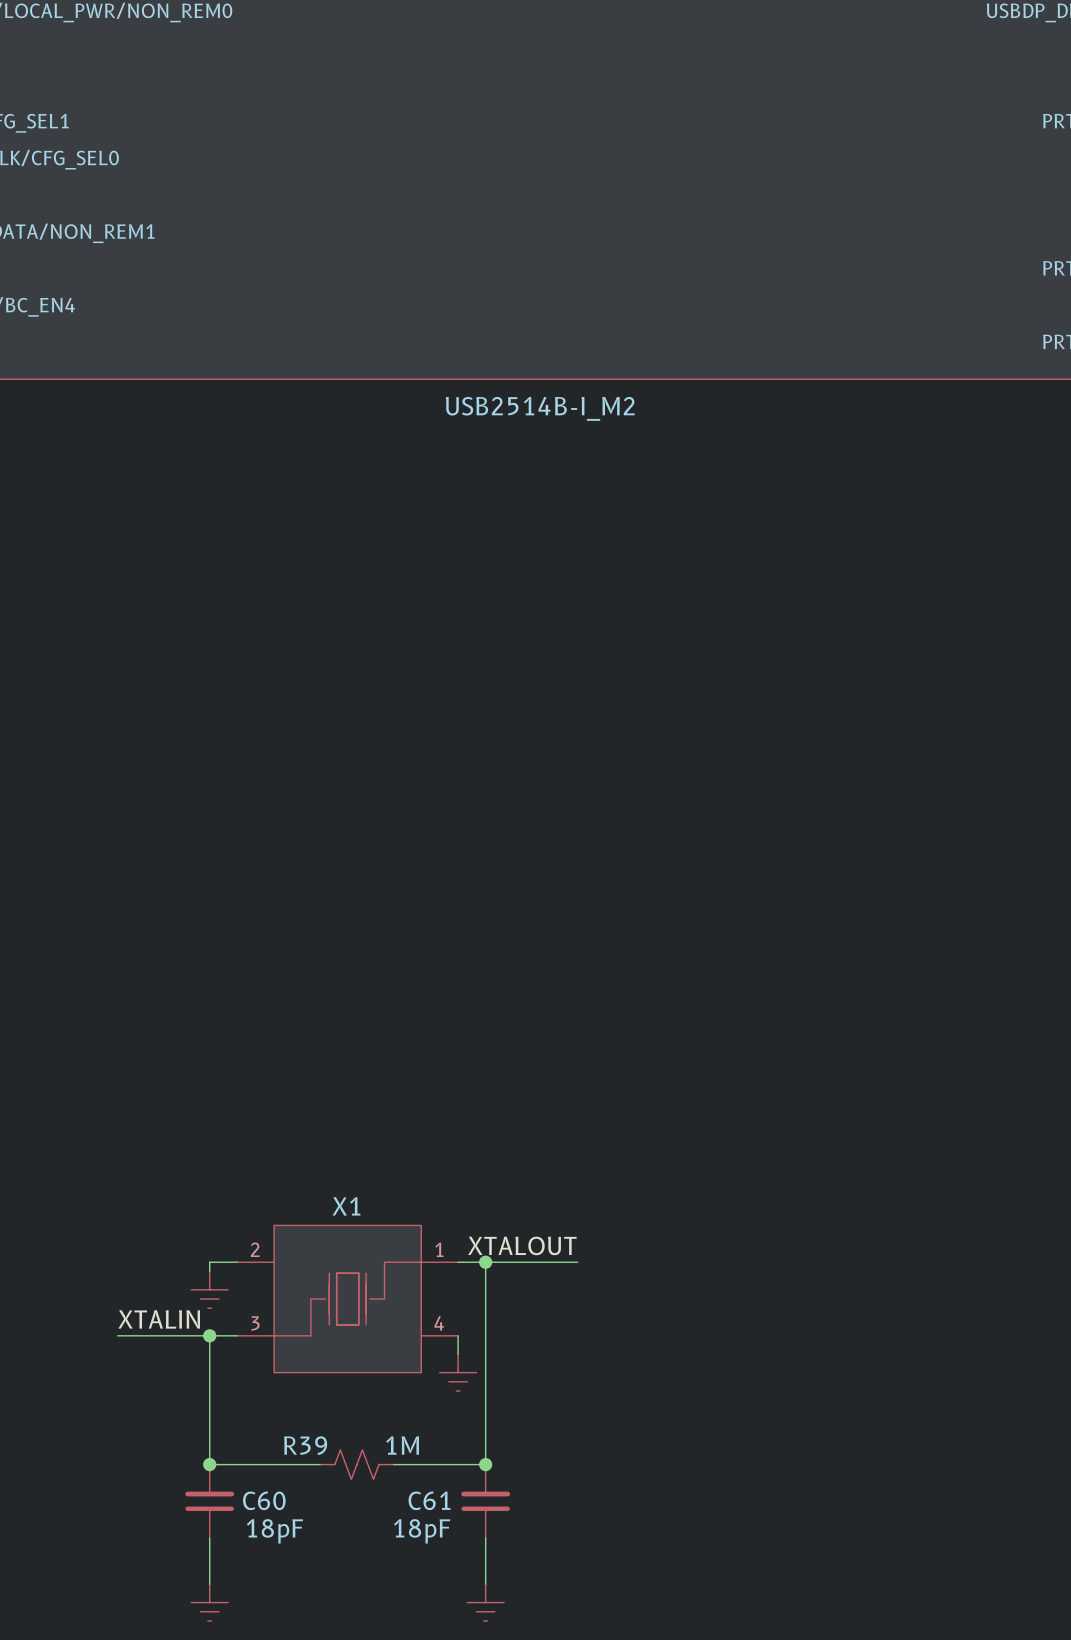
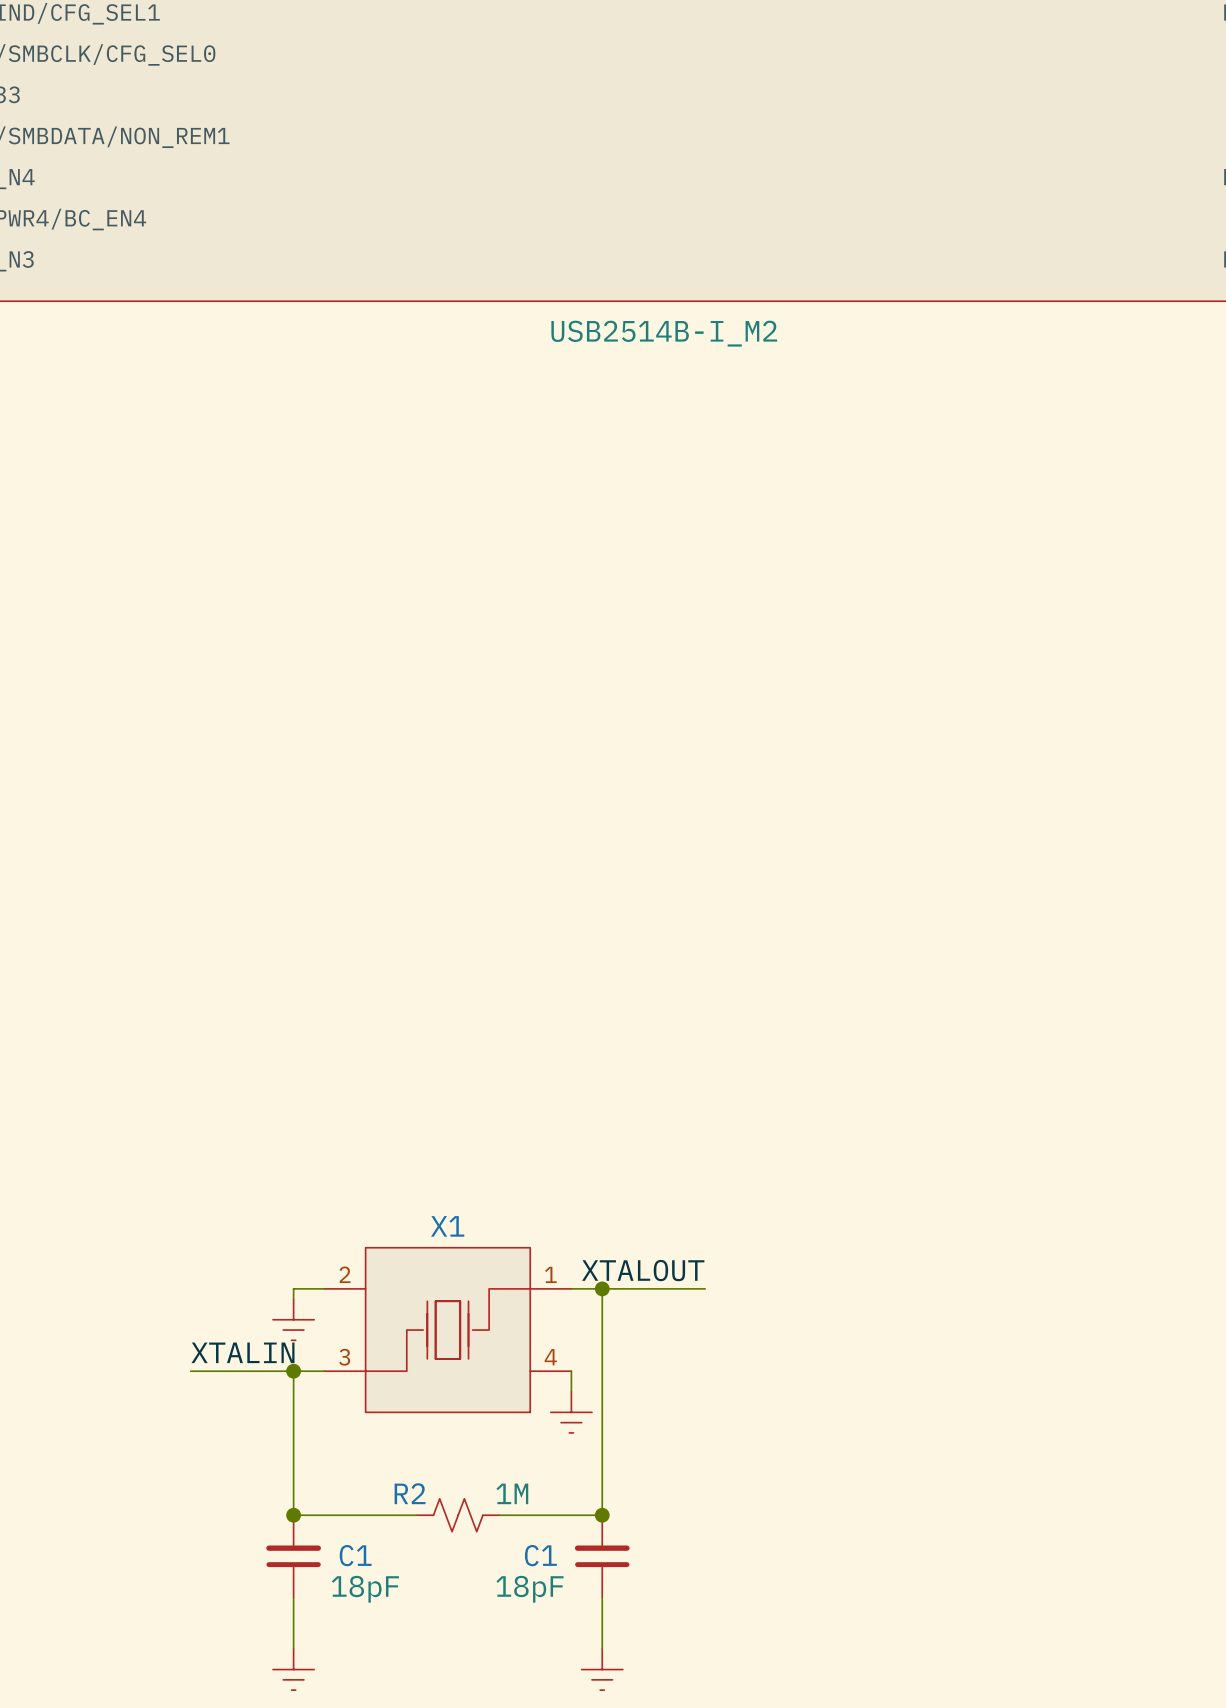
R39 name: R39 (305, 1445) -> R2 (410, 1493)
C60 name: C60 (264, 1500) -> C1 (355, 1555)
C61 name: C61 (429, 1500) -> C1 (540, 1555)

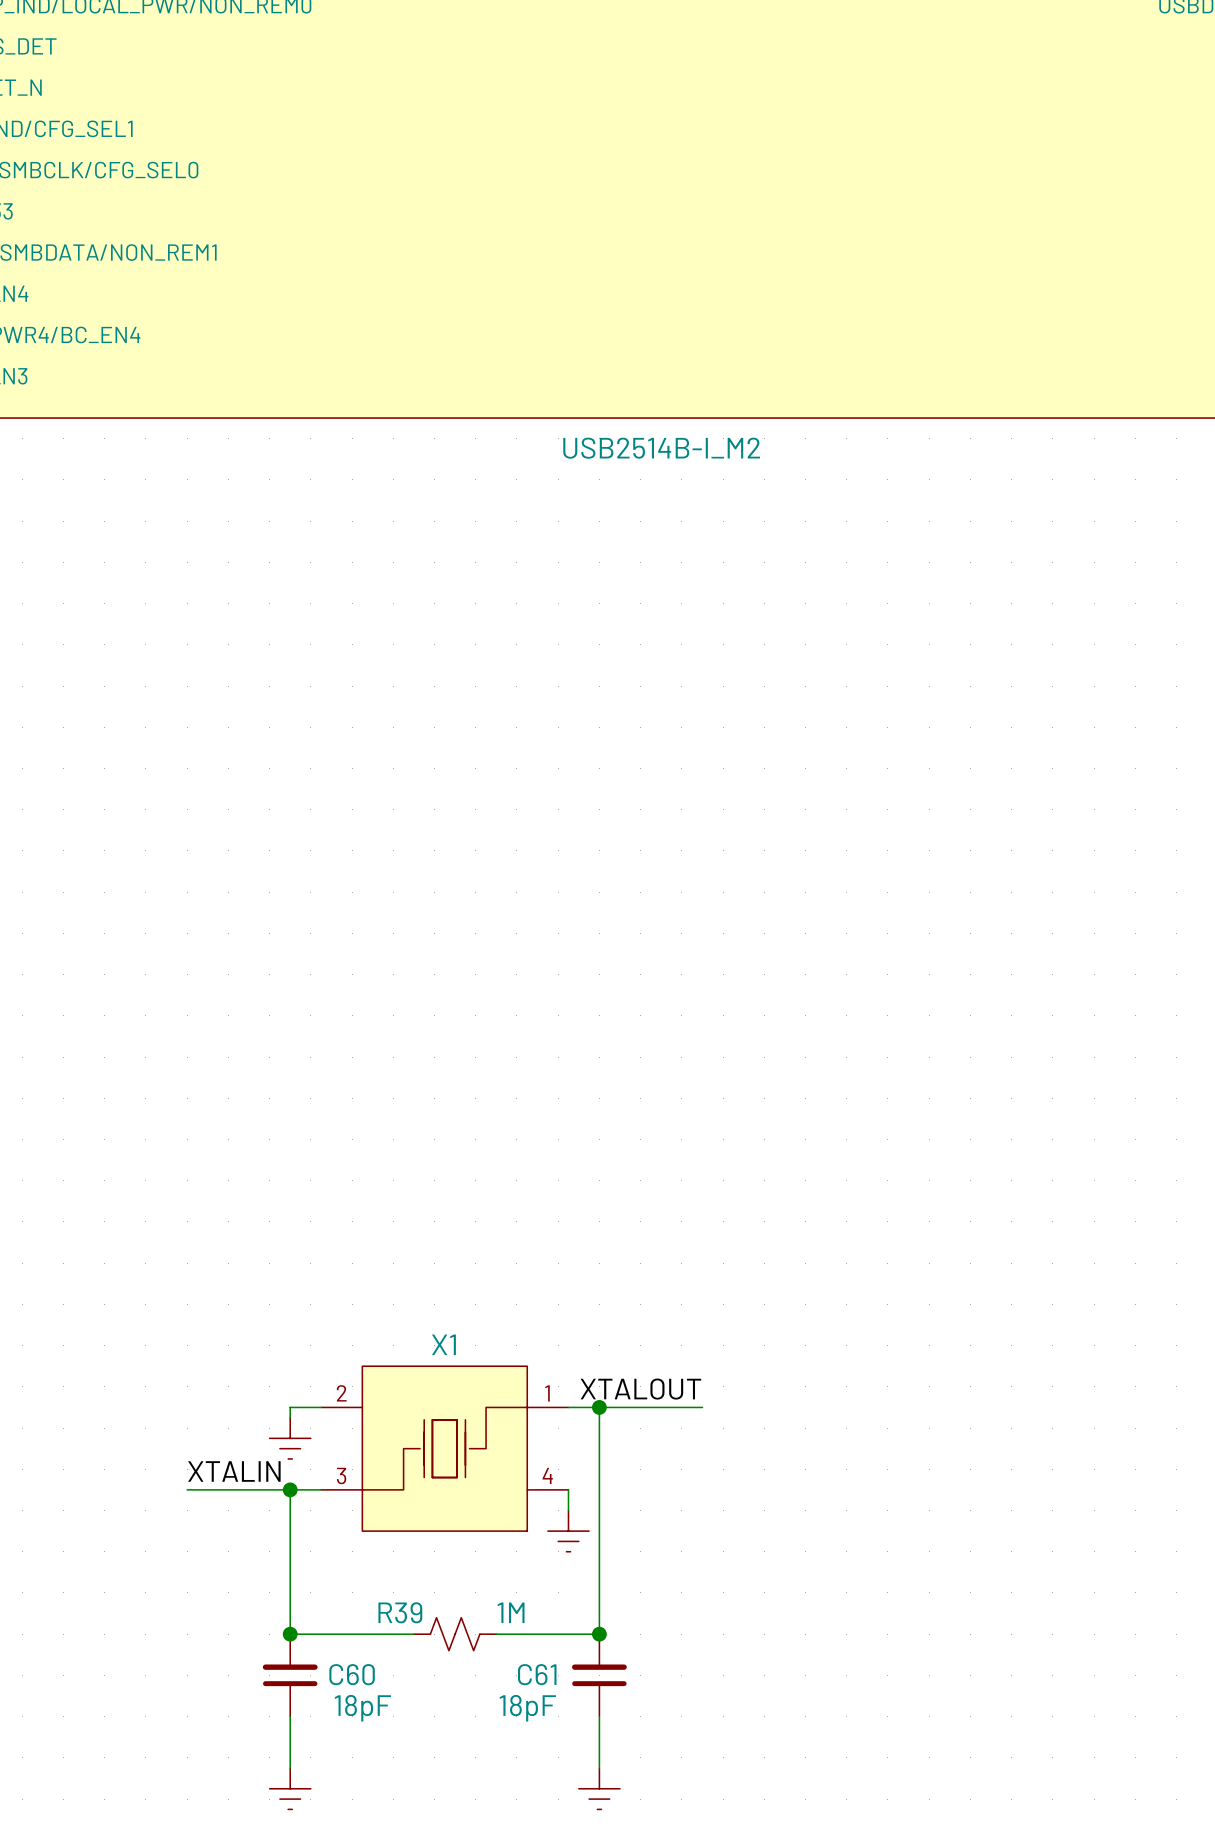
R2 name: R2 (410, 1493) -> R39 (400, 1612)
C1 name: C1 (355, 1555) -> C60 (352, 1674)
C1 name: C1 (540, 1555) -> C61 (537, 1674)

